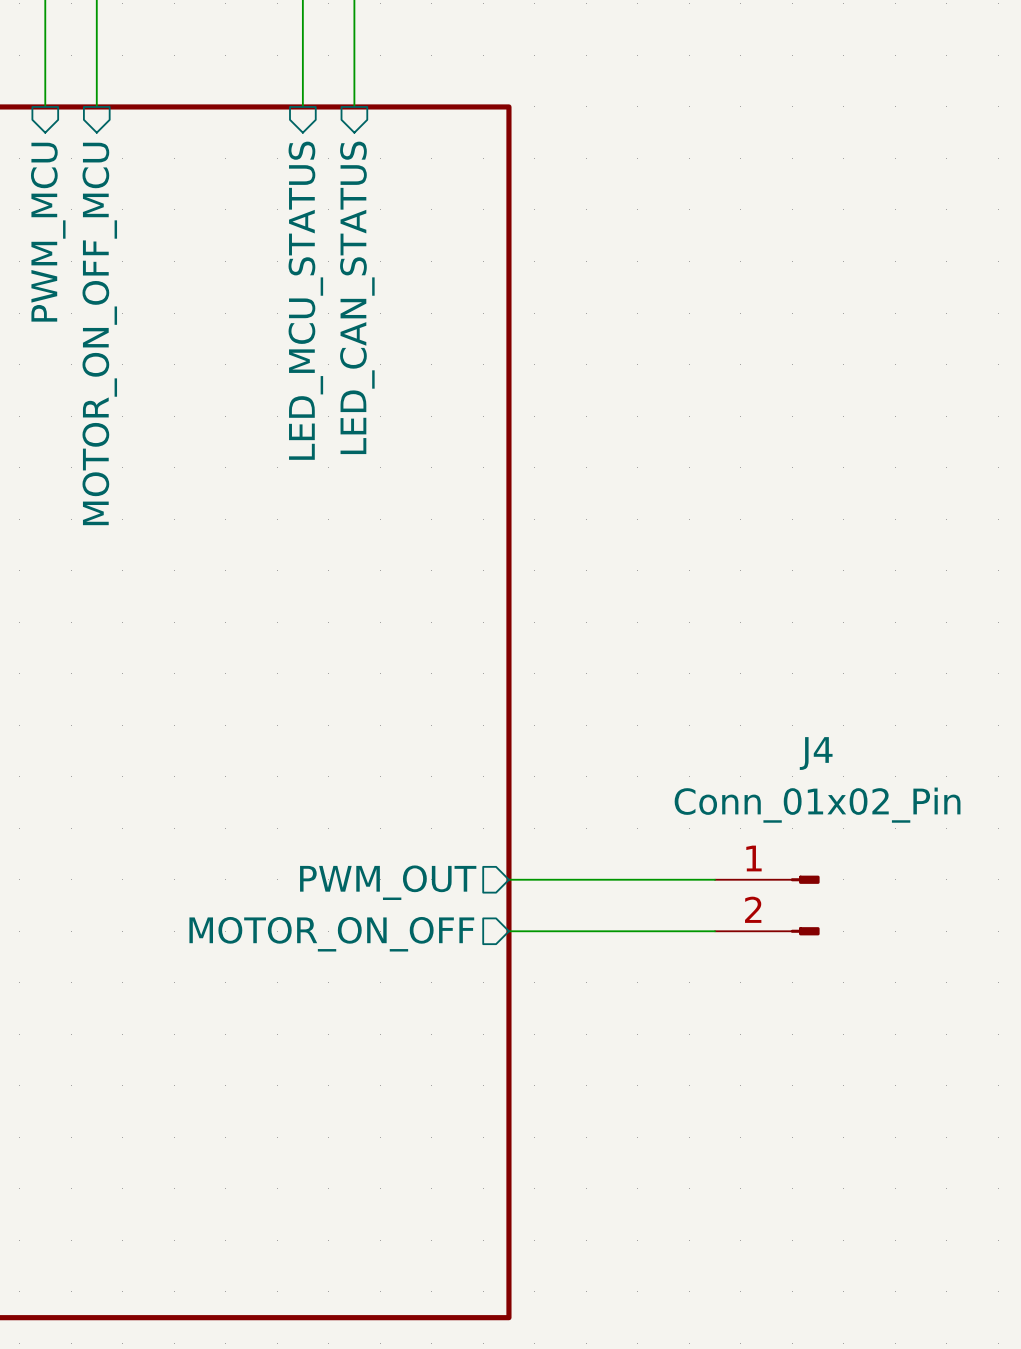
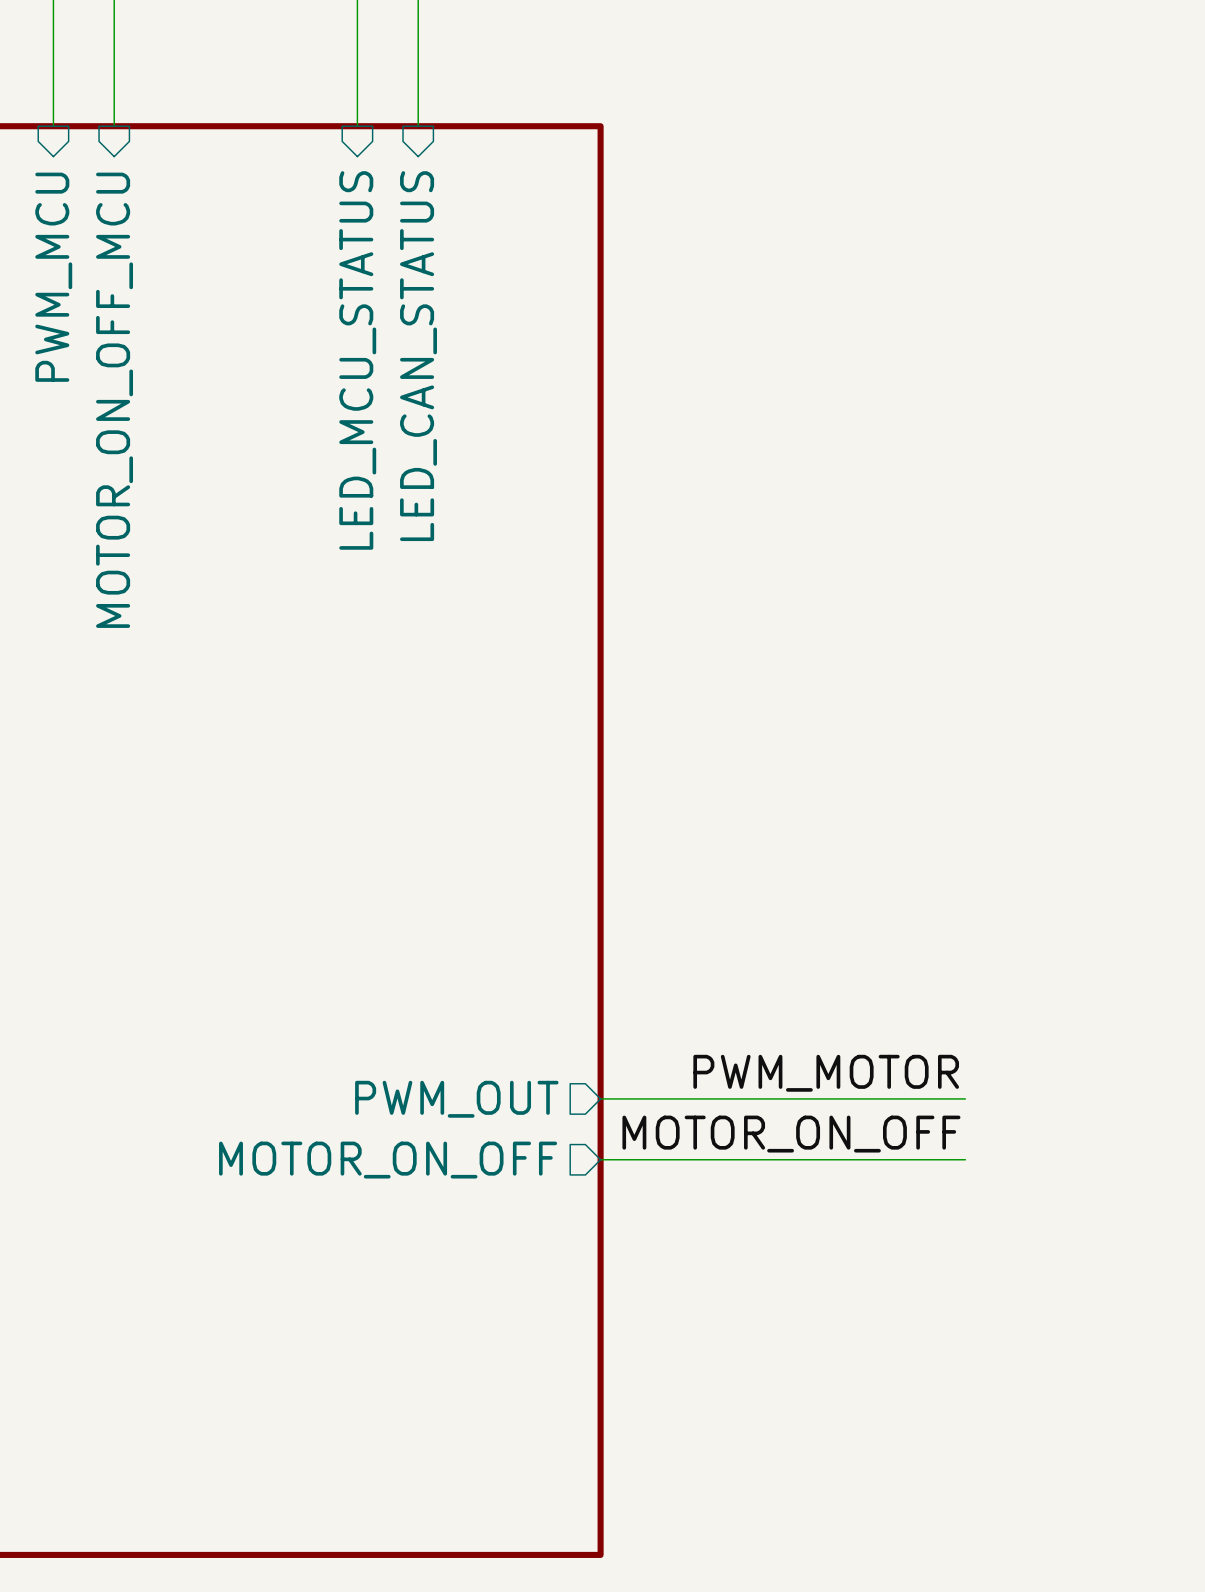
wire: (508, 879) (715, 879) -> none
sheet pin: PWM_OUT (388, 882) -> none
J4: Conn_01x02_Pin (767, 905) -> none
label: none -> PWM_MOTOR (826, 1073)
sheet pin: MOTOR_ON_OFF (331, 934) -> PWM_OUT (456, 1099)
label: none -> MOTOR_ON_OFF (791, 1134)
wire: none -> (600, 1159) (965, 1159)
sheet pin: none -> MOTOR_ON_OFF (388, 1160)

